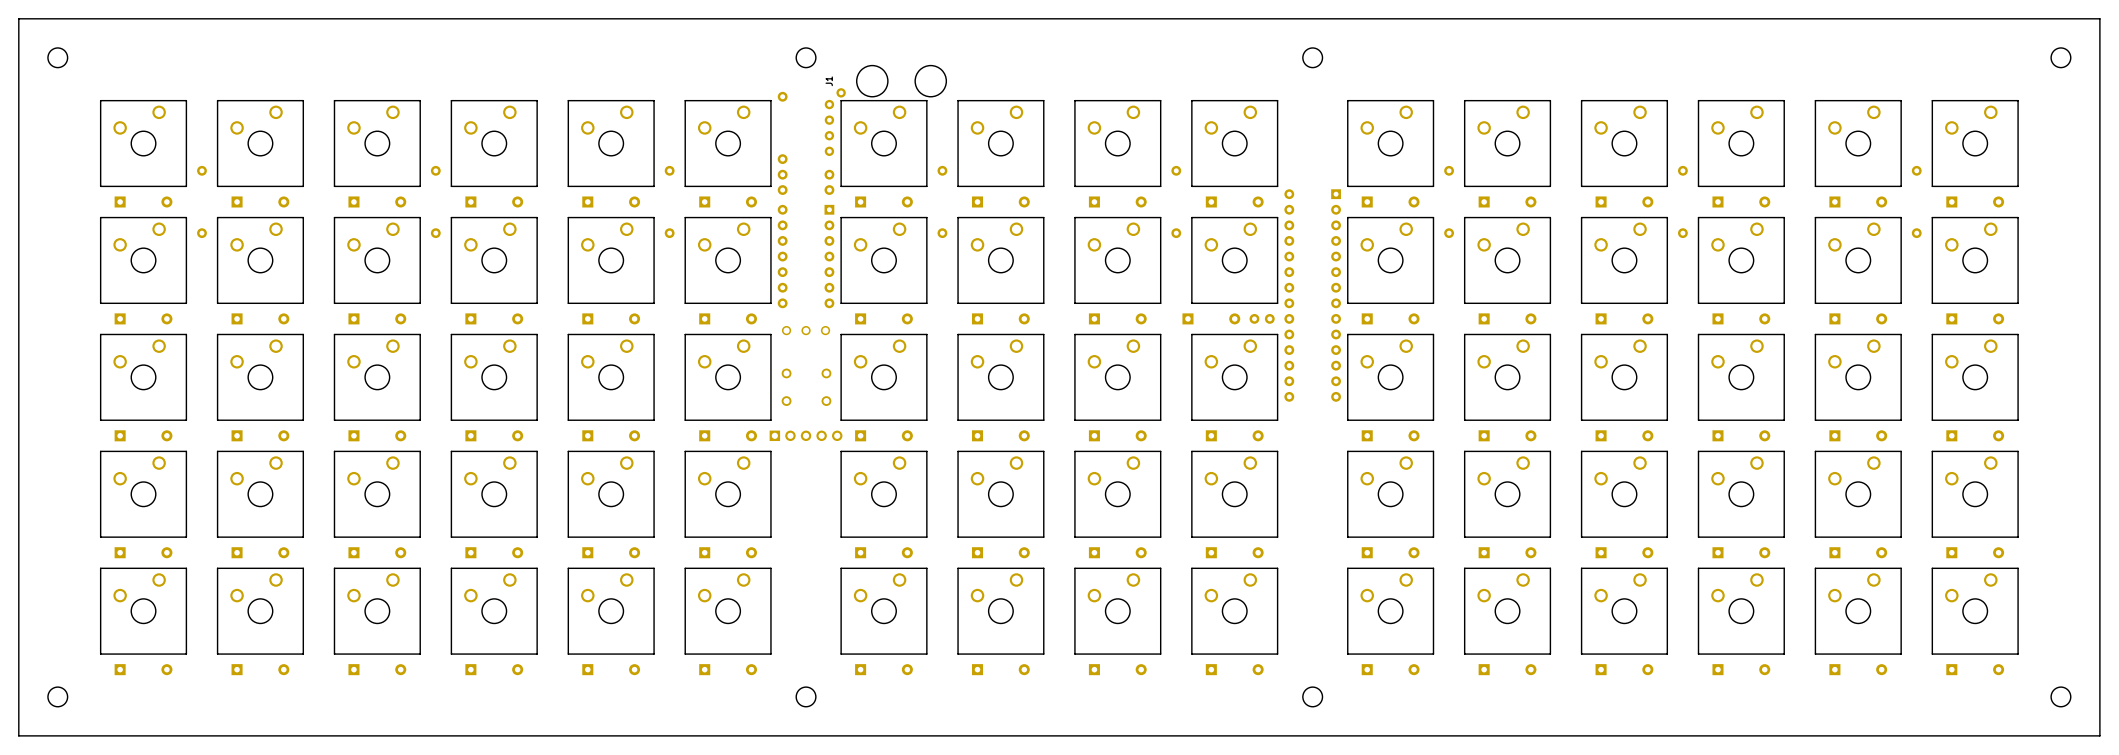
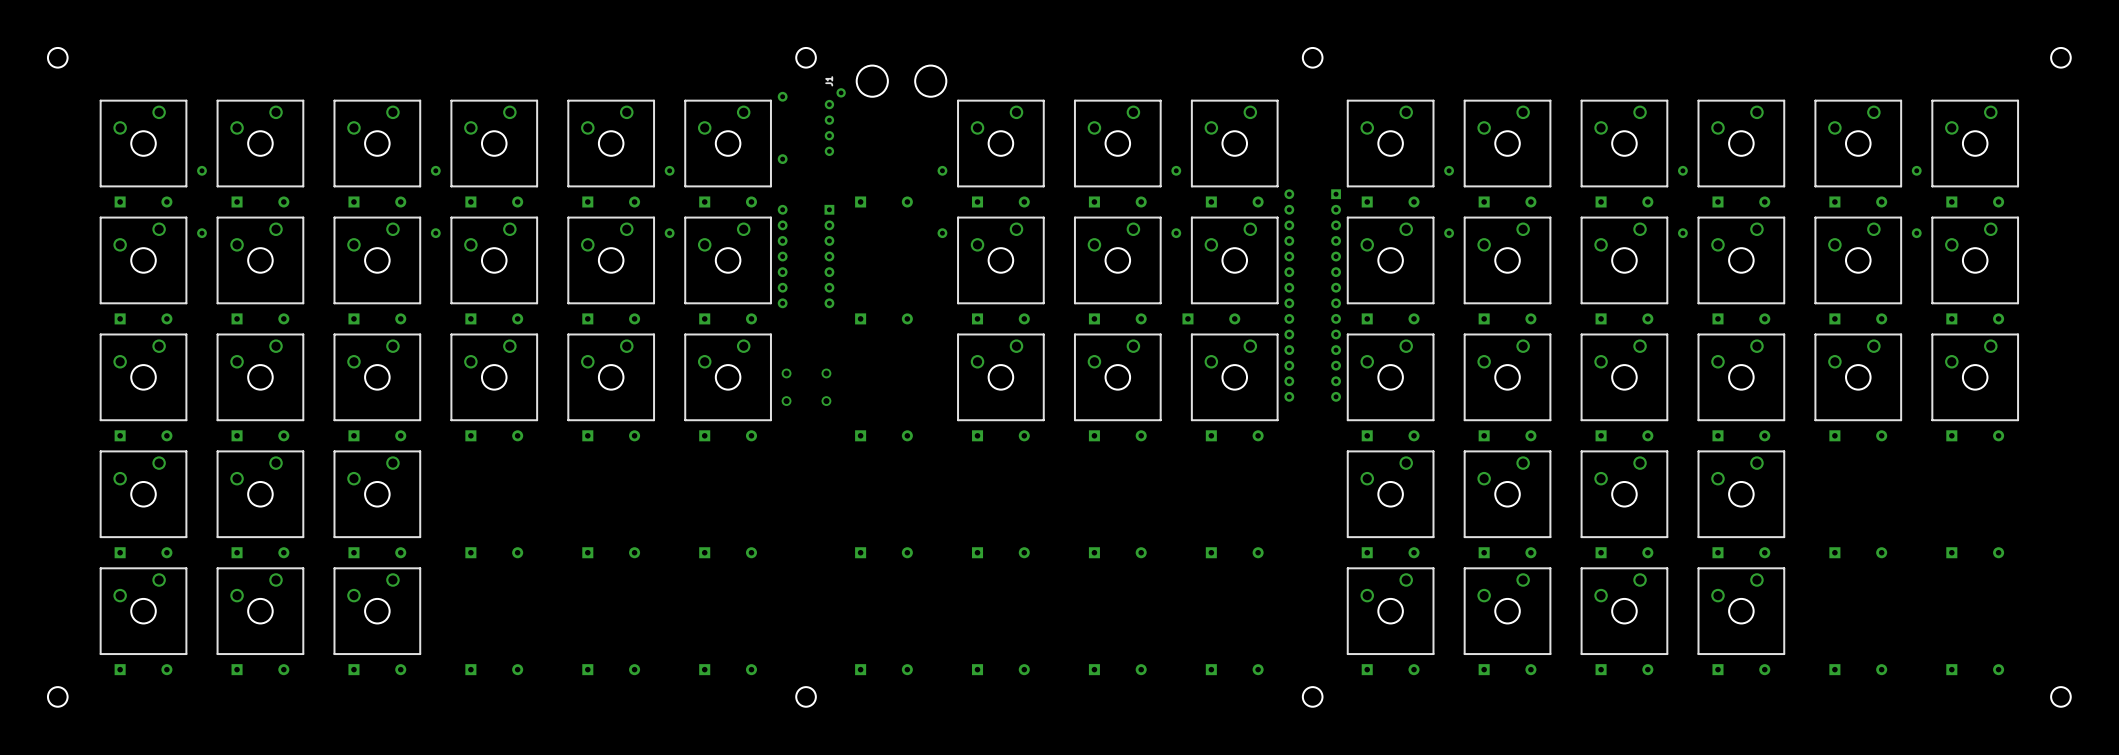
board edge: (18, 18) (2099, 18) (2099, 735) (18, 735) (18, 18) -> none
part: (883, 143) -> none
part: (782, 182) -> none
part: (829, 182) -> none
part: (883, 260) -> none
part: (1262, 318) -> none
part: (786, 330) -> none
part: (806, 330) -> none
part: (825, 330) -> none
part: (883, 377) -> none
part: (806, 435) -> none
part: (494, 494) -> none
part: (611, 494) -> none
part: (728, 494) -> none
part: (883, 494) -> none
part: (1000, 494) -> none
part: (1117, 494) -> none
part: (1234, 494) -> none
part: (1858, 494) -> none
part: (1975, 494) -> none
part: (494, 611) -> none
part: (611, 611) -> none
part: (728, 611) -> none
part: (883, 611) -> none
part: (1000, 611) -> none
part: (1117, 611) -> none
part: (1234, 611) -> none
part: (1858, 611) -> none
part: (1975, 611) -> none

